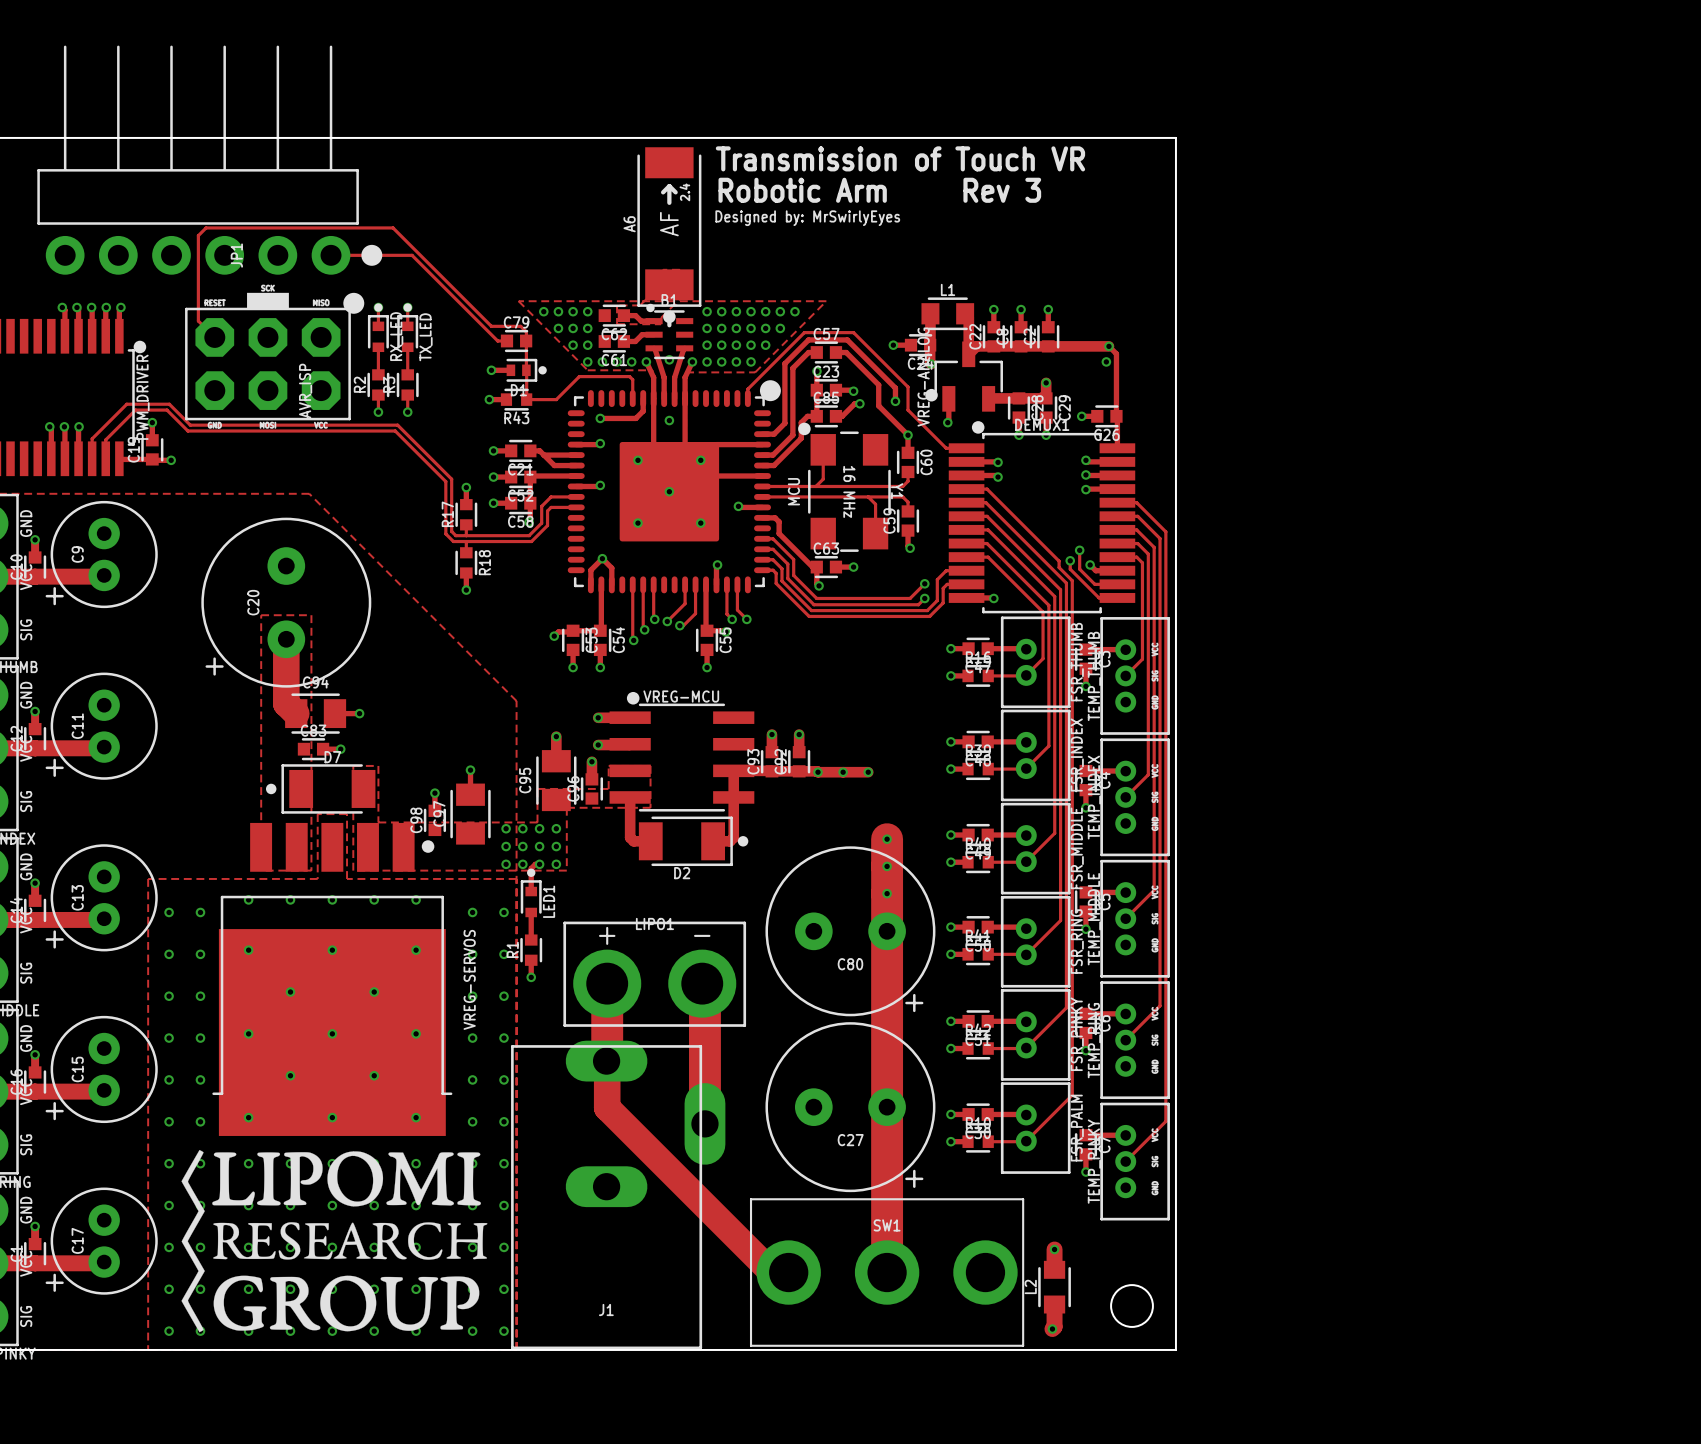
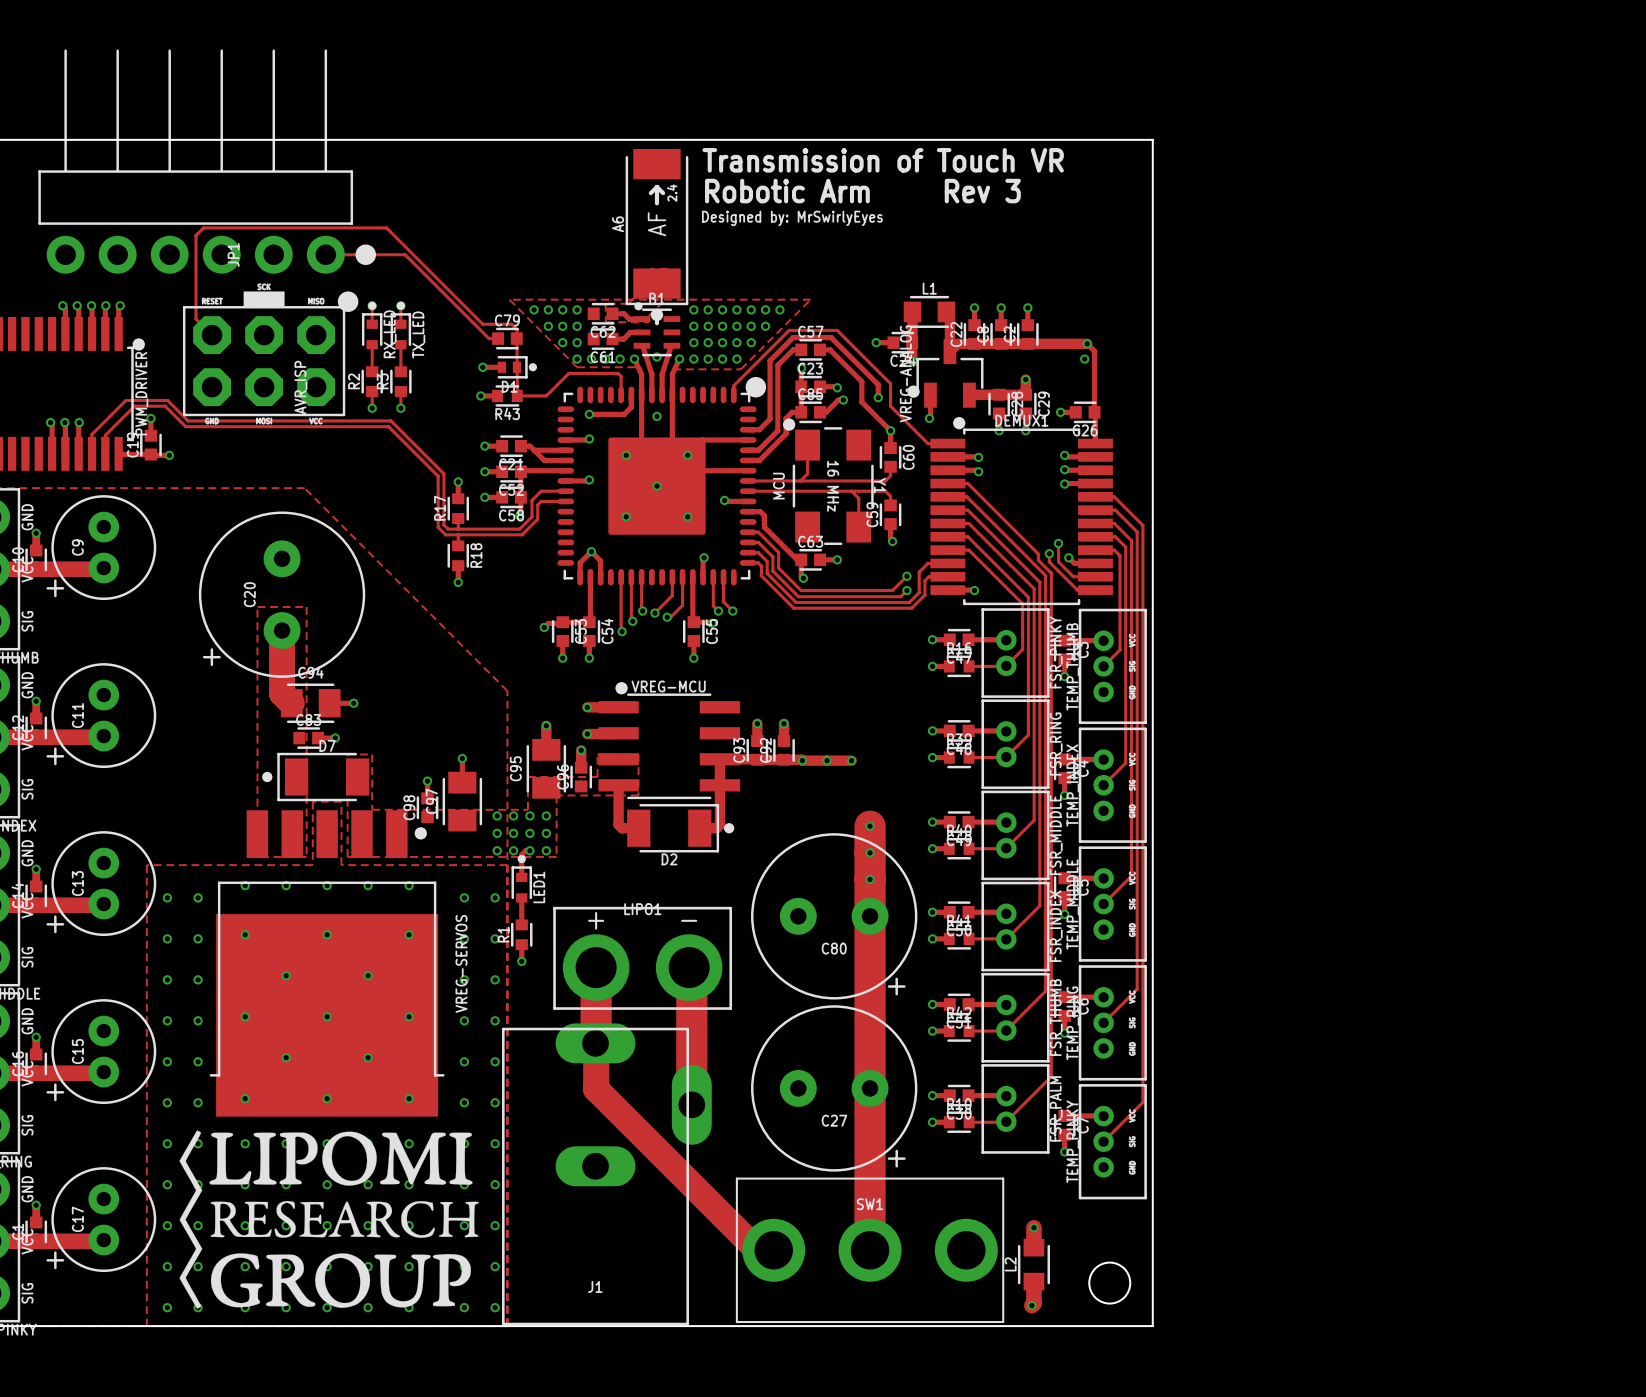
FSR_THUMB name: FSR_THUMB (1077, 662) -> FSR_PINKY (1056, 652)
FSR_INDEX name: FSR_INDEX (1077, 755) -> FSR_RING (1056, 744)
FSR_RING name: FSR_RING (1077, 941) -> FSR_INDEX (1056, 926)
FSR_PINKY name: FSR_PINKY (1077, 1034) -> FSR_THUMB (1056, 1017)

